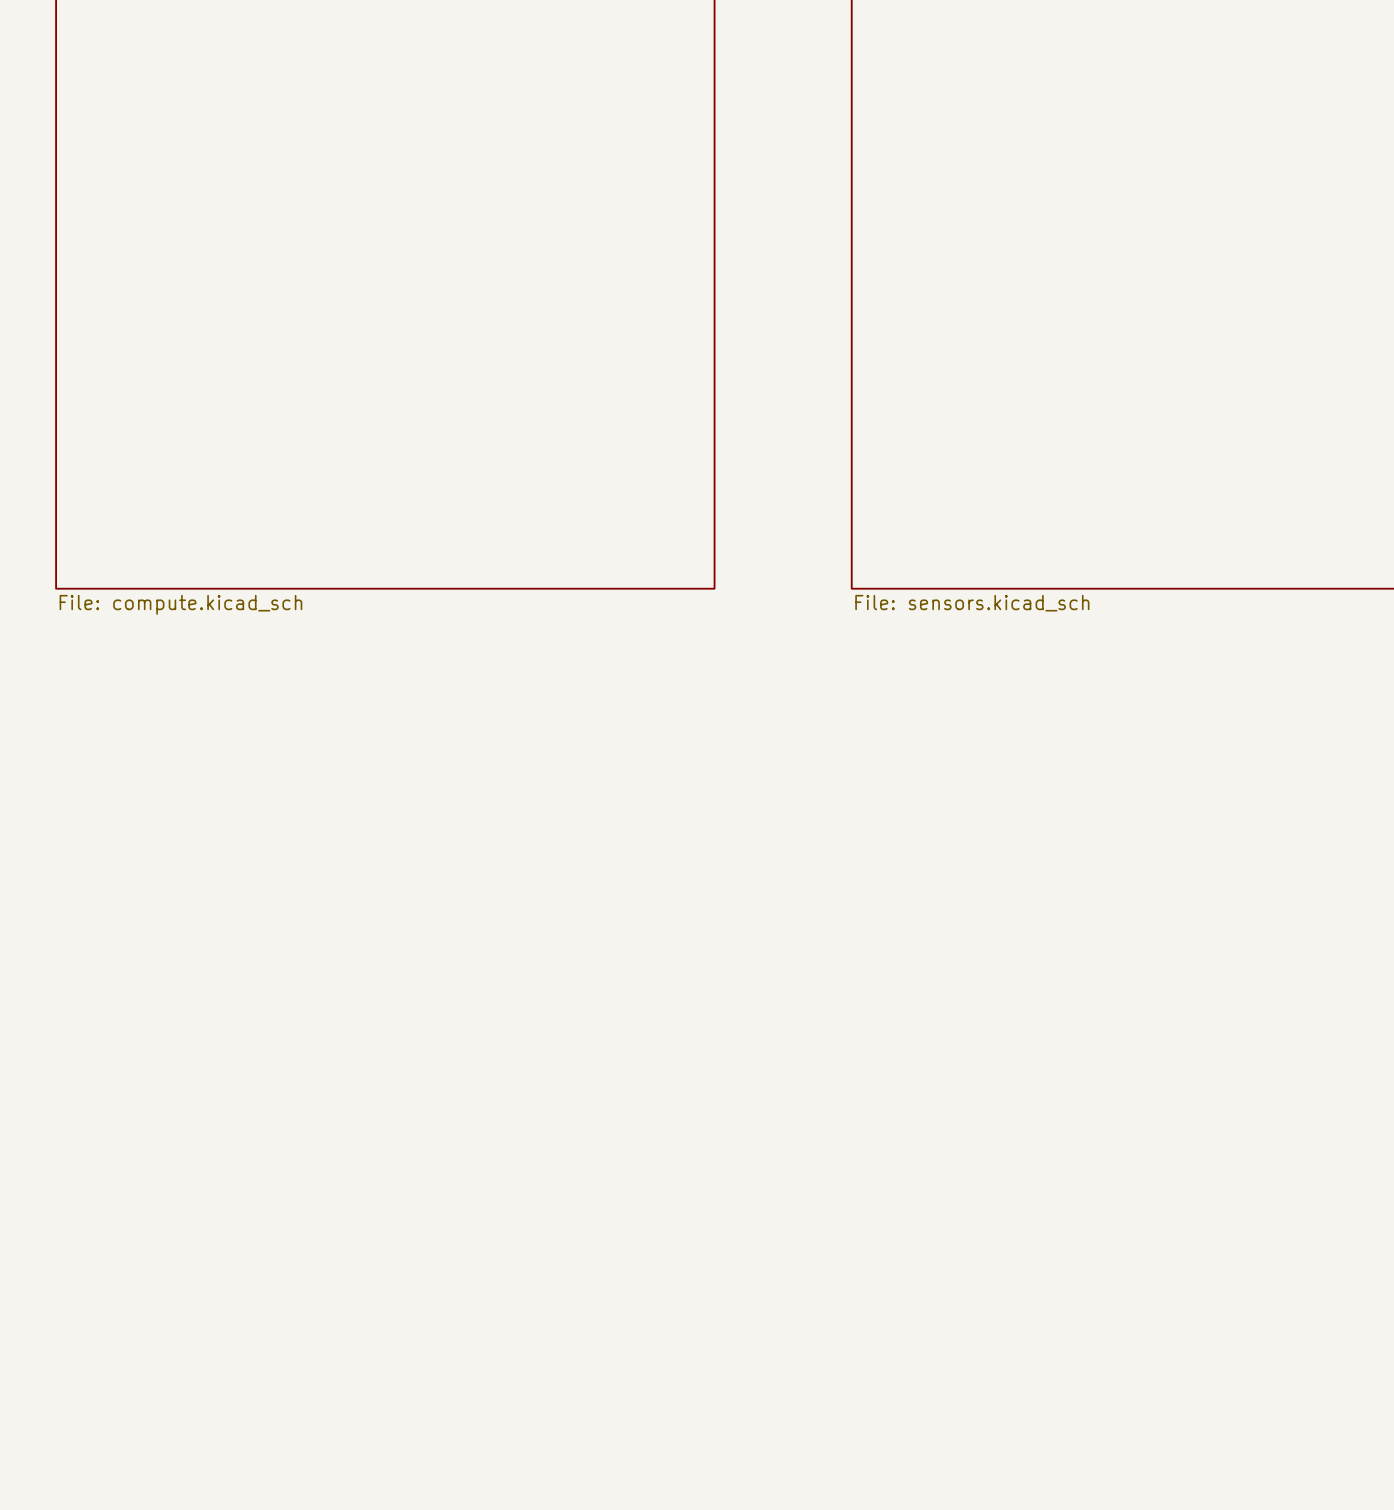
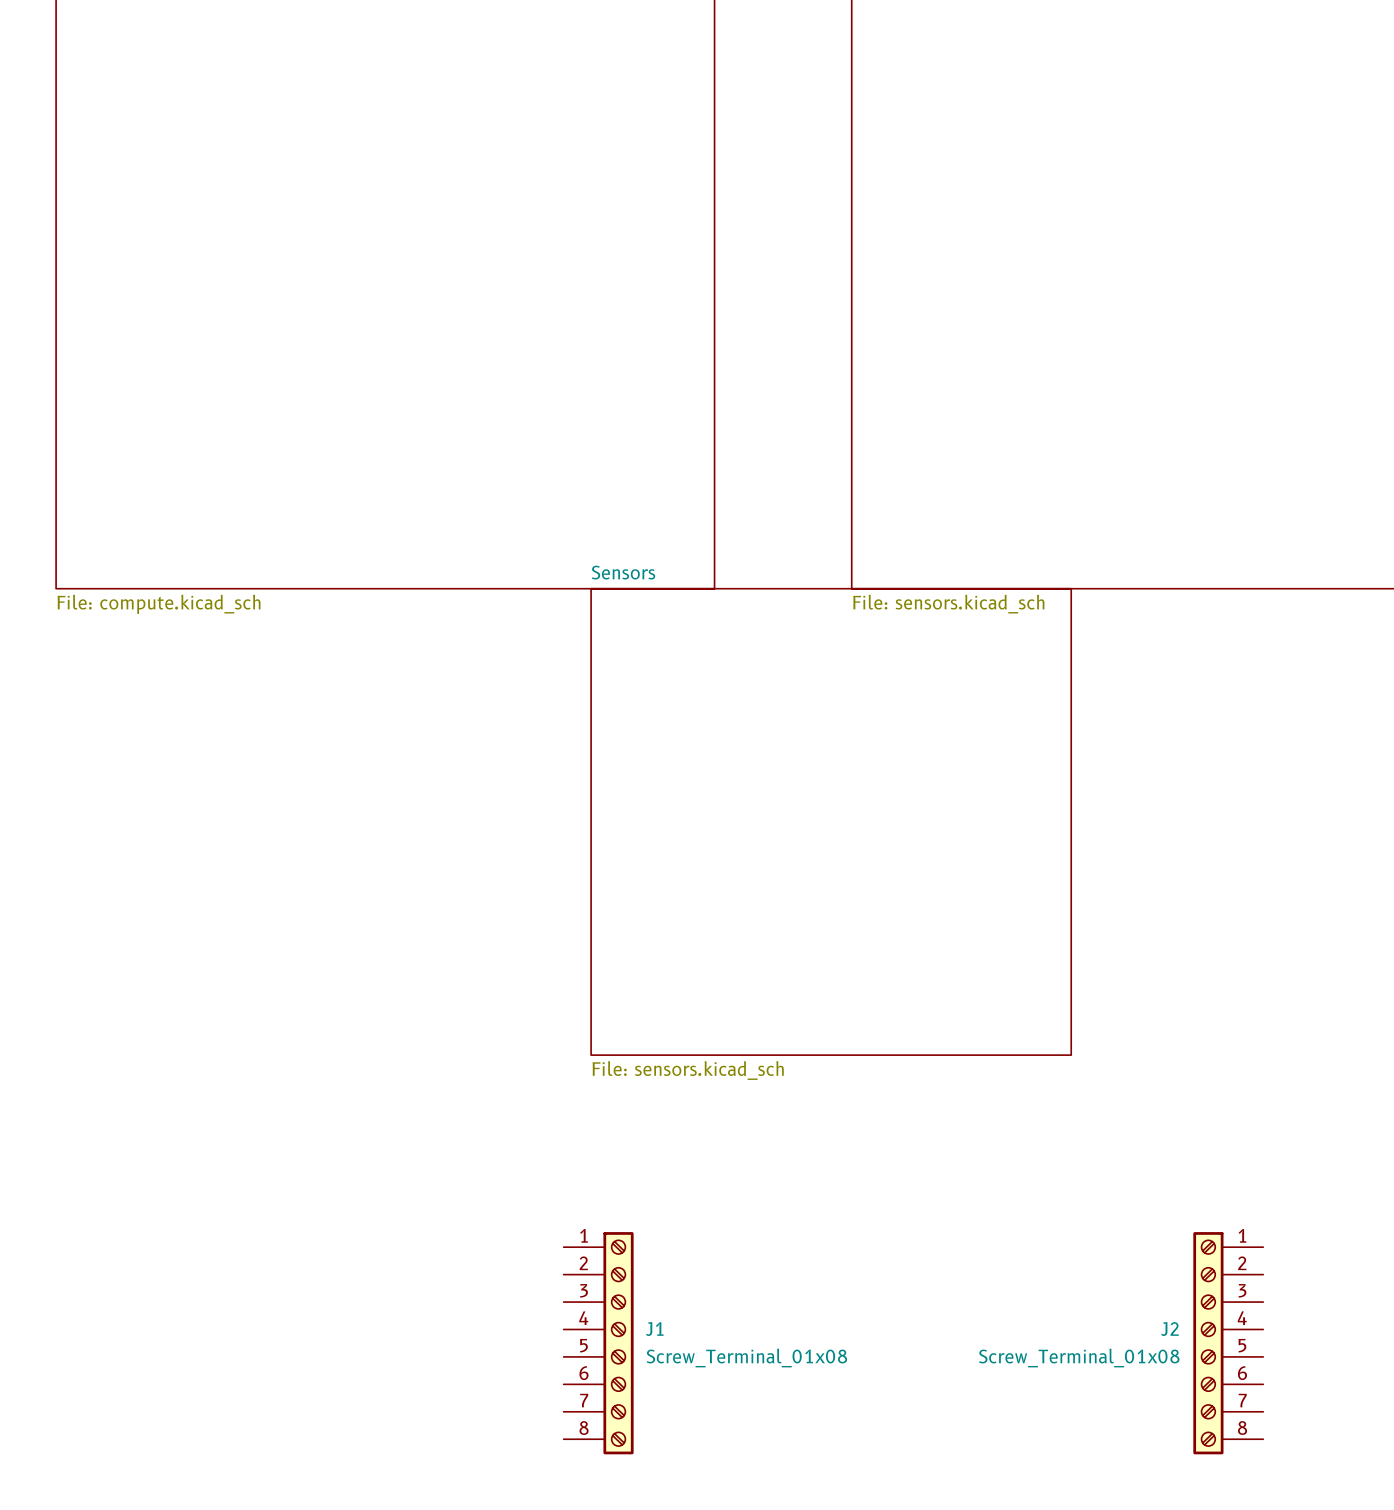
sheet Sensors: none -> File: sensors.kicad_sch (831, 821)
J1: none -> Screw_Terminal_01x08 (598, 1343)
J2: none -> Screw_Terminal_01x08 (1228, 1343)

